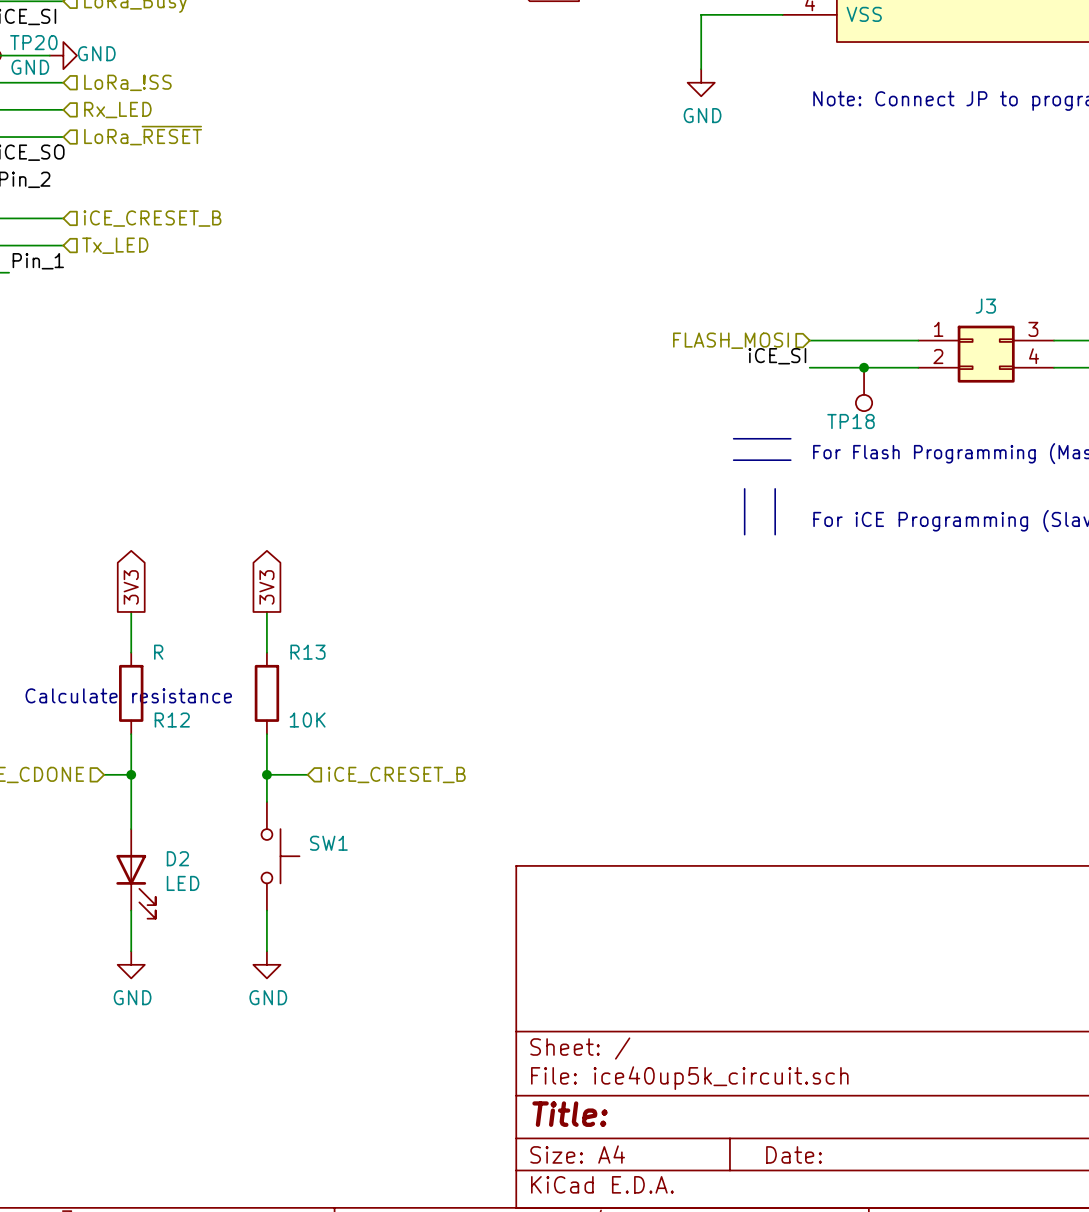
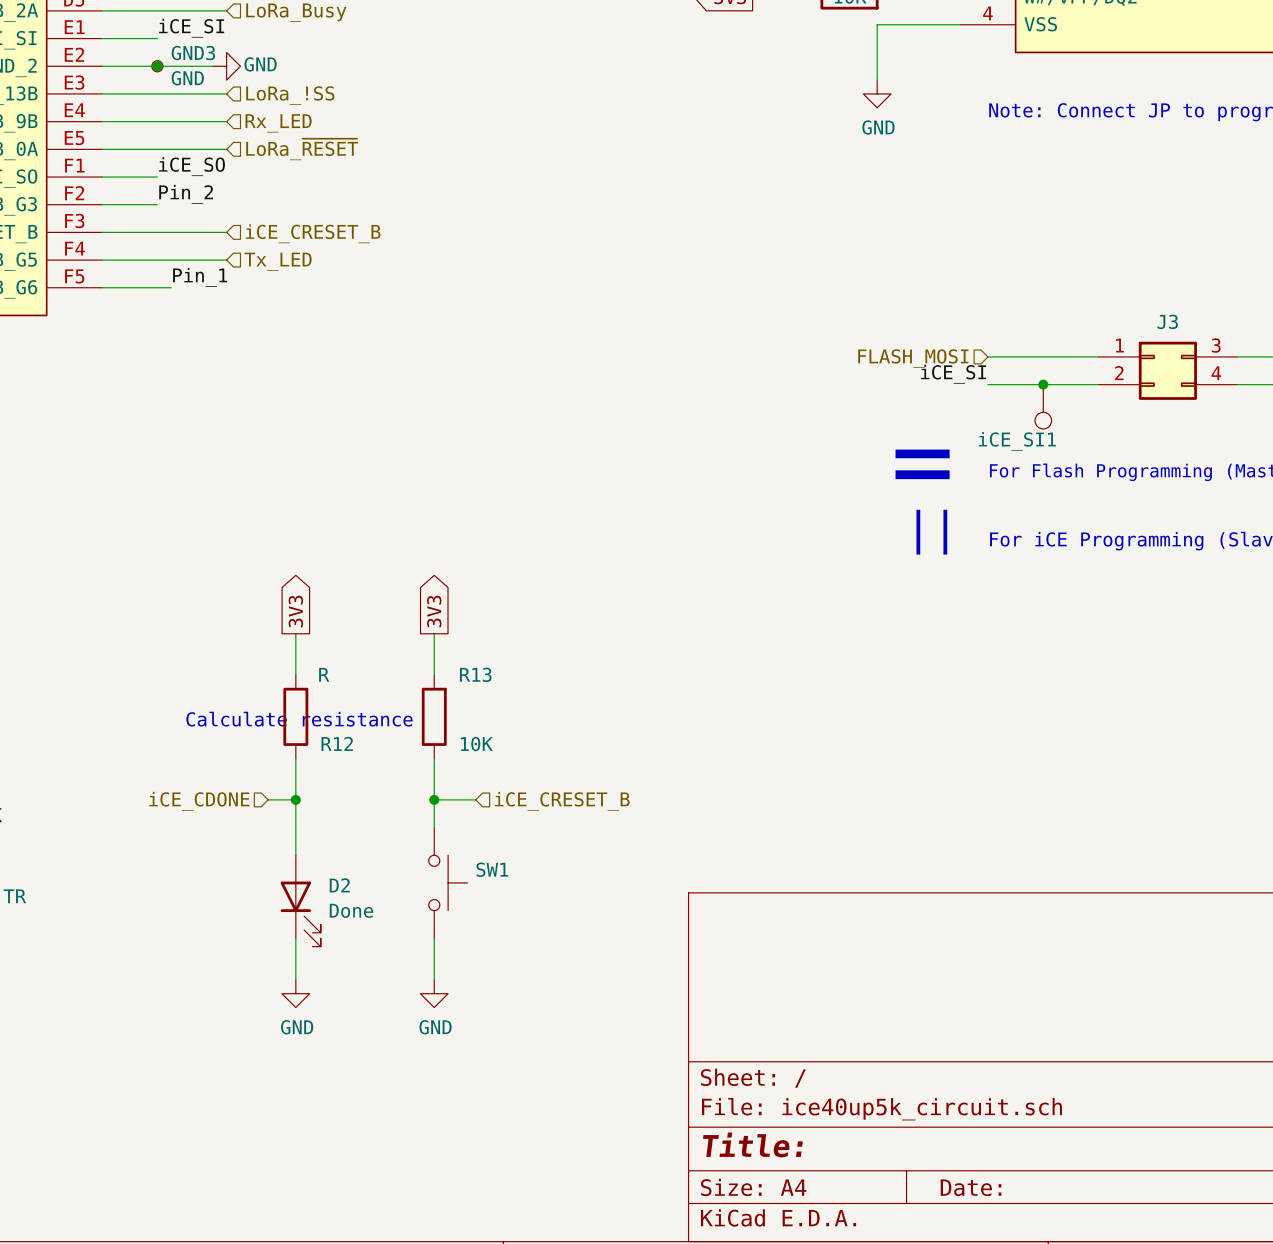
TP20 name: TP20 (33, 42) -> GND3 (193, 53)
TP18 name: TP18 (851, 421) -> iCE_SI1 (1017, 441)
D2 value: LED (183, 883) -> Done (351, 910)

